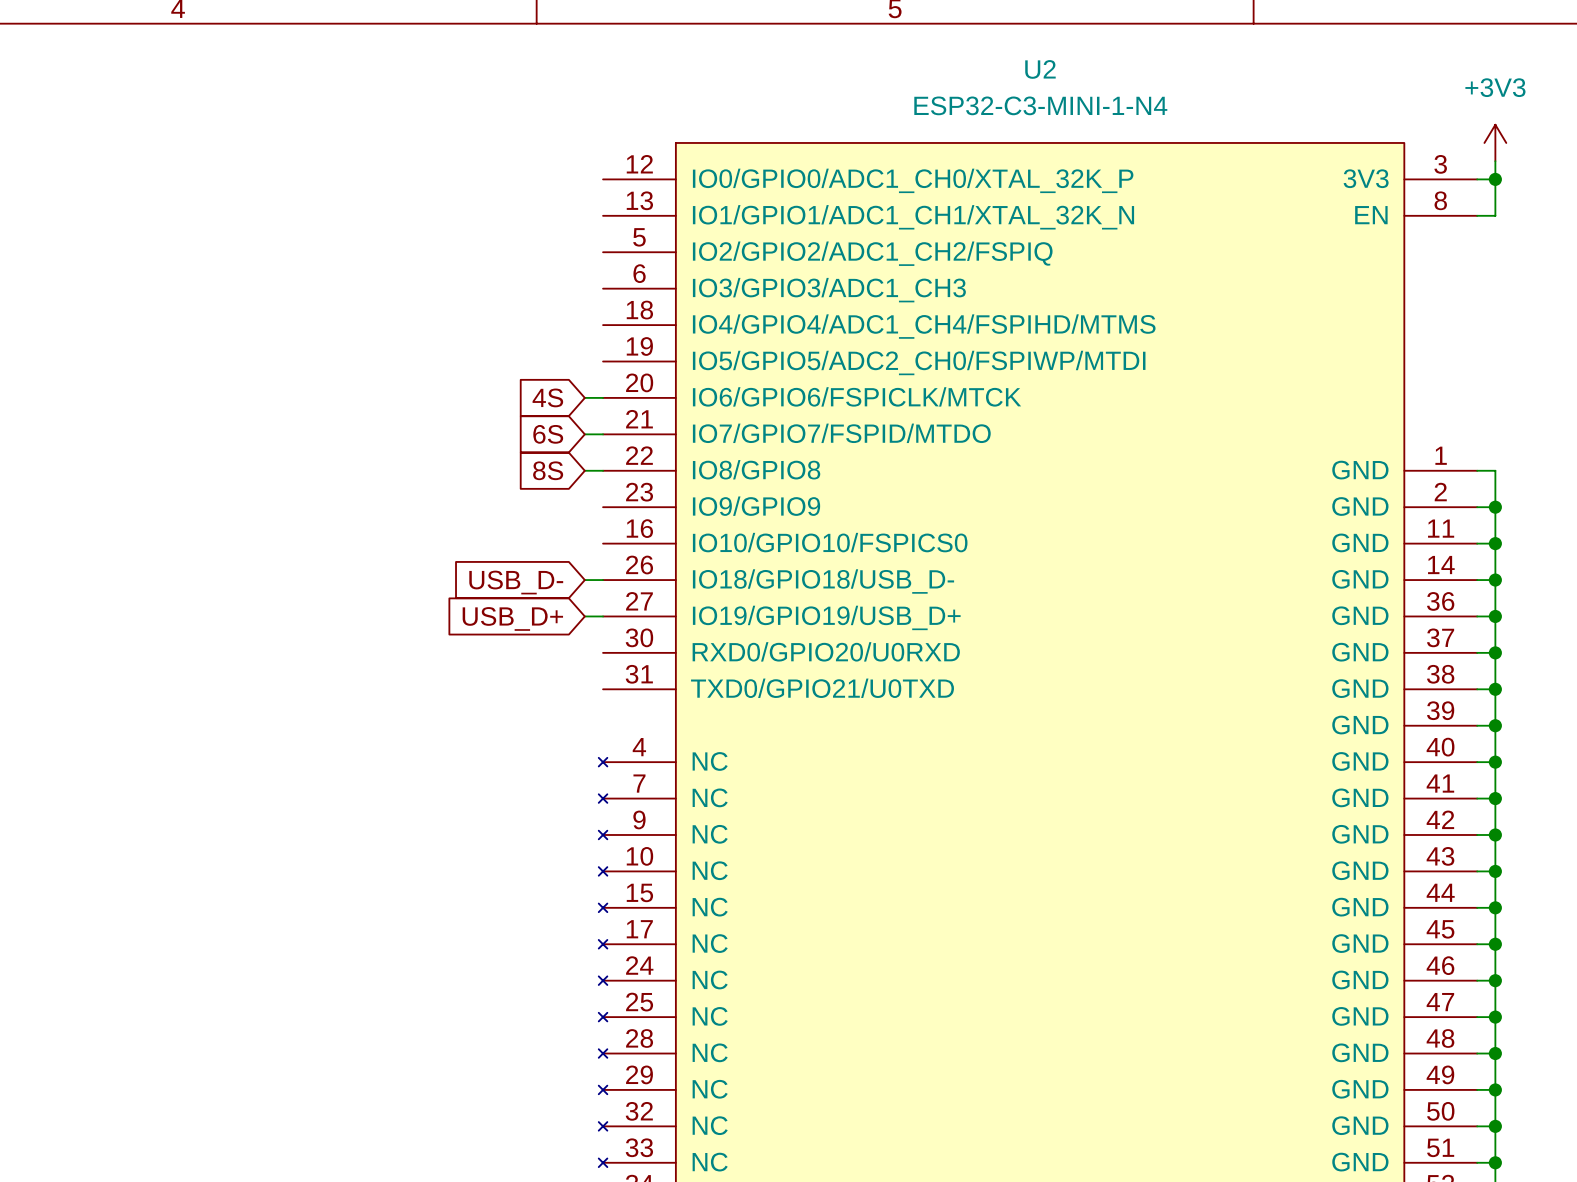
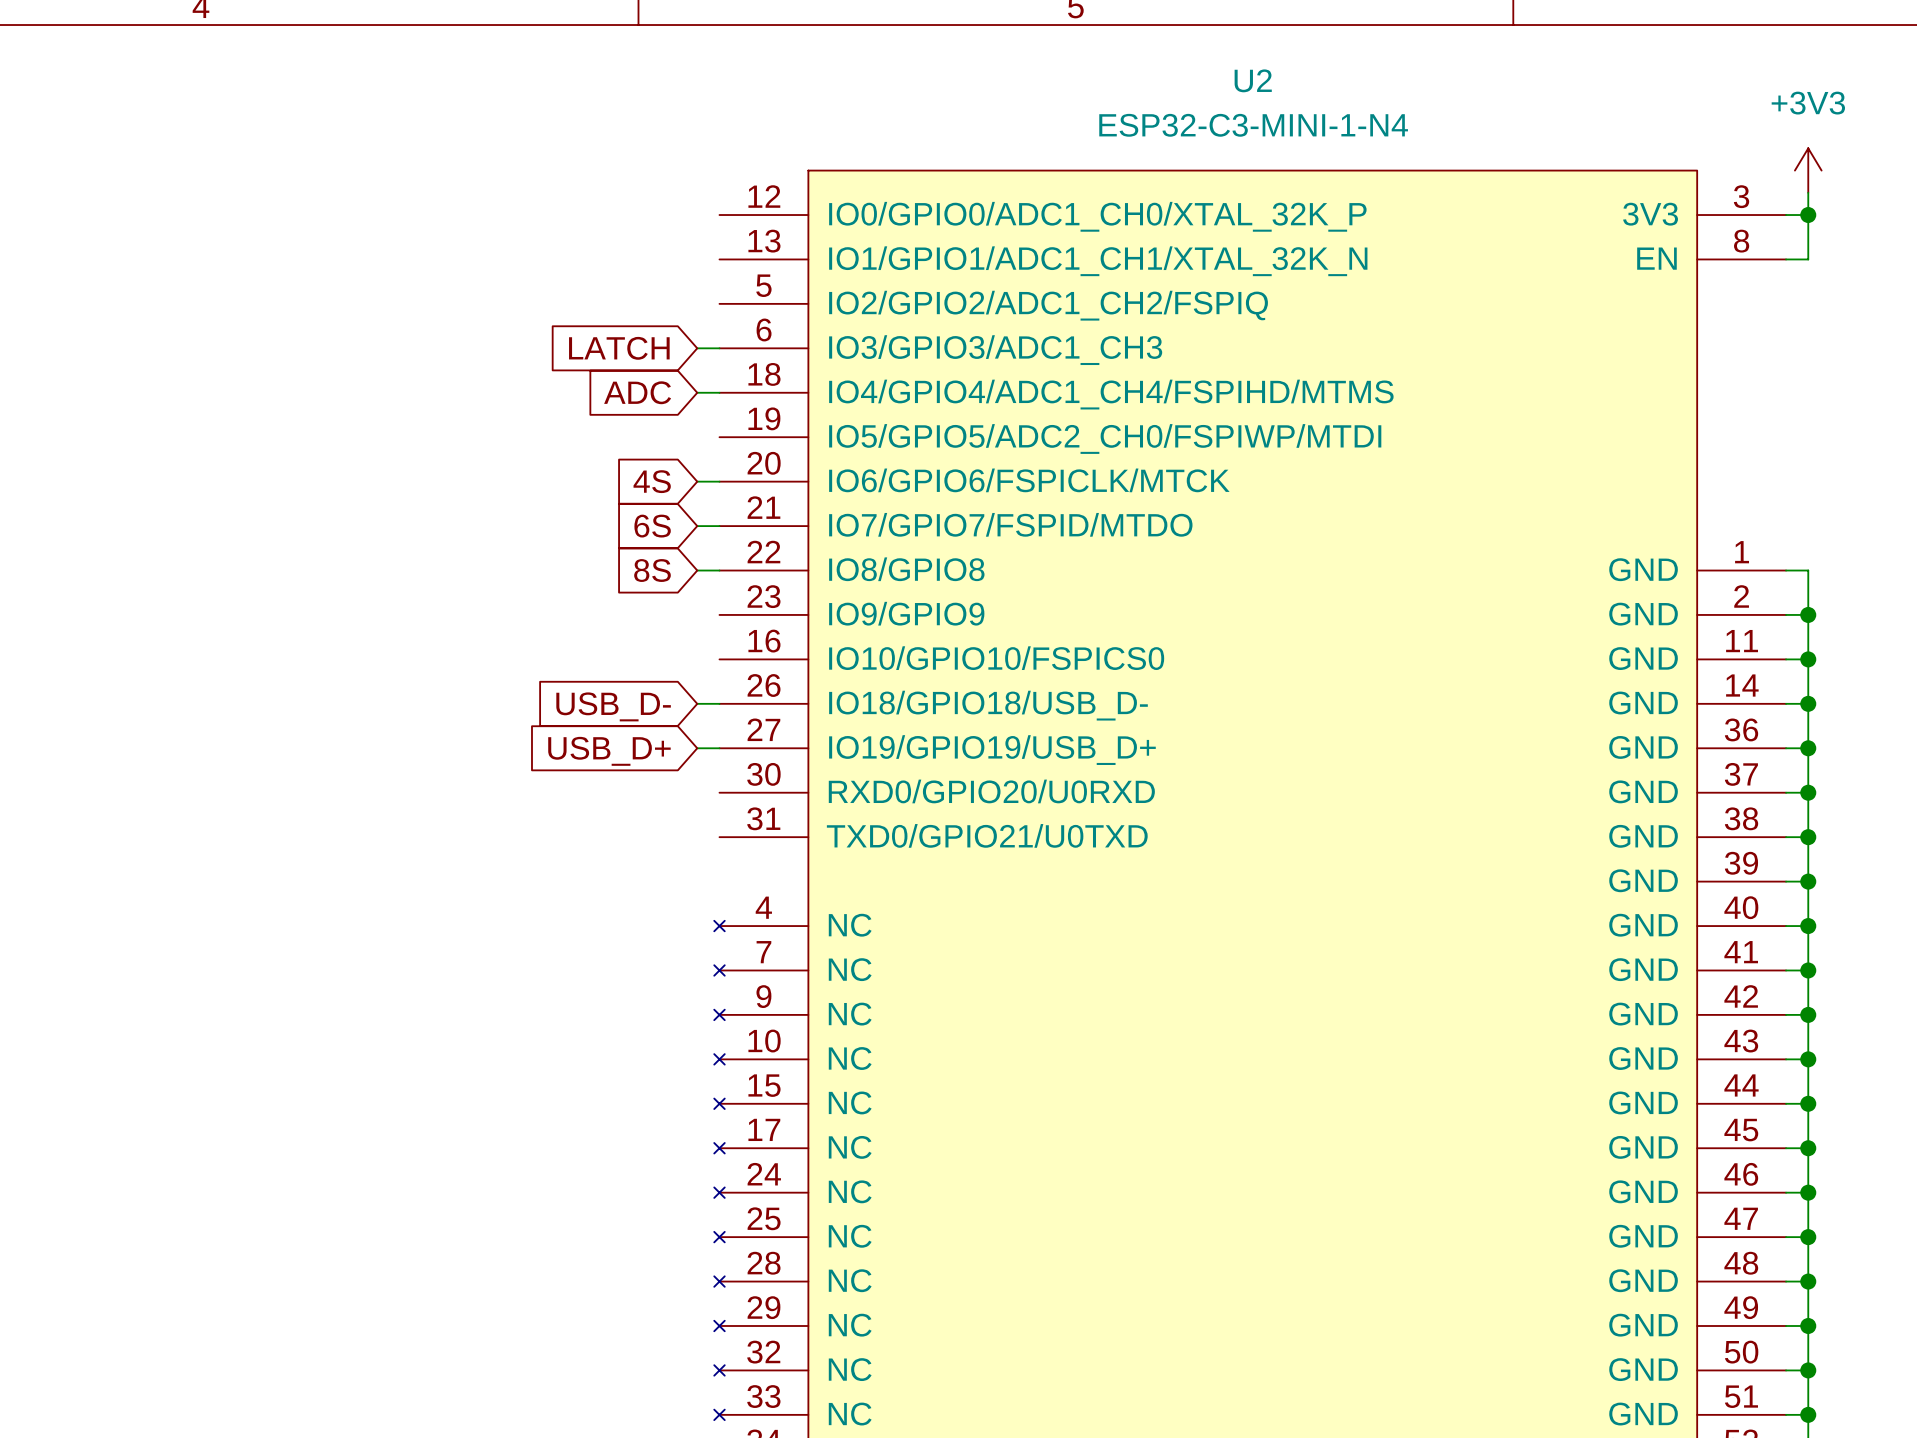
global label: none -> LATCH (619, 348)
wire: none -> (697, 348) (719, 348)
global label: none -> ADC (637, 392)
wire: none -> (697, 392) (719, 392)

